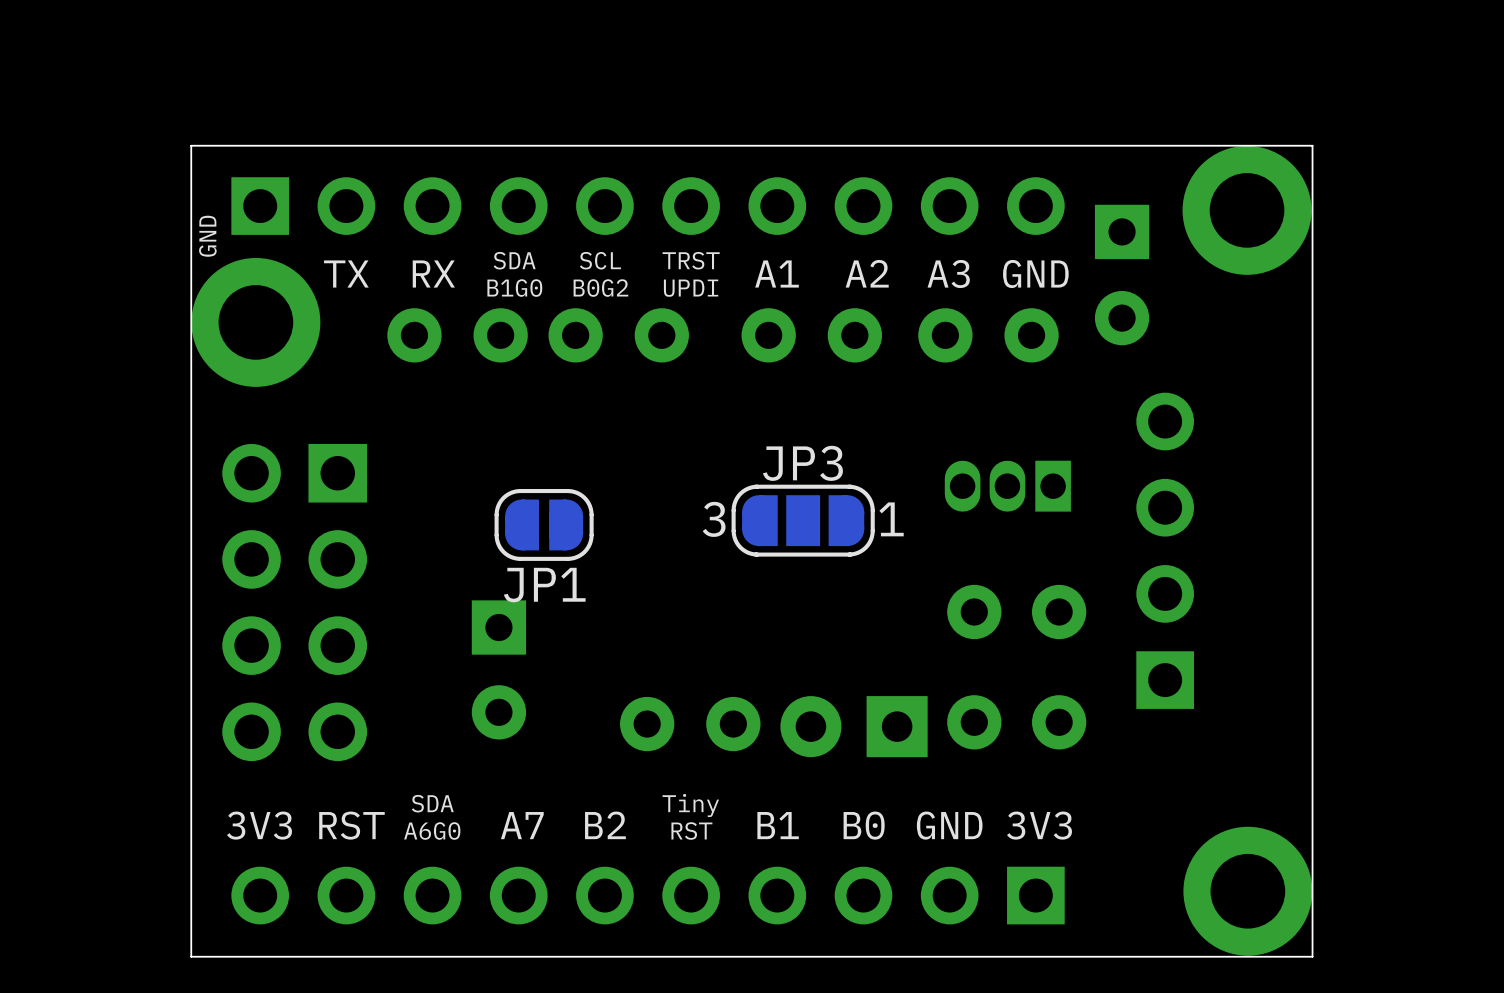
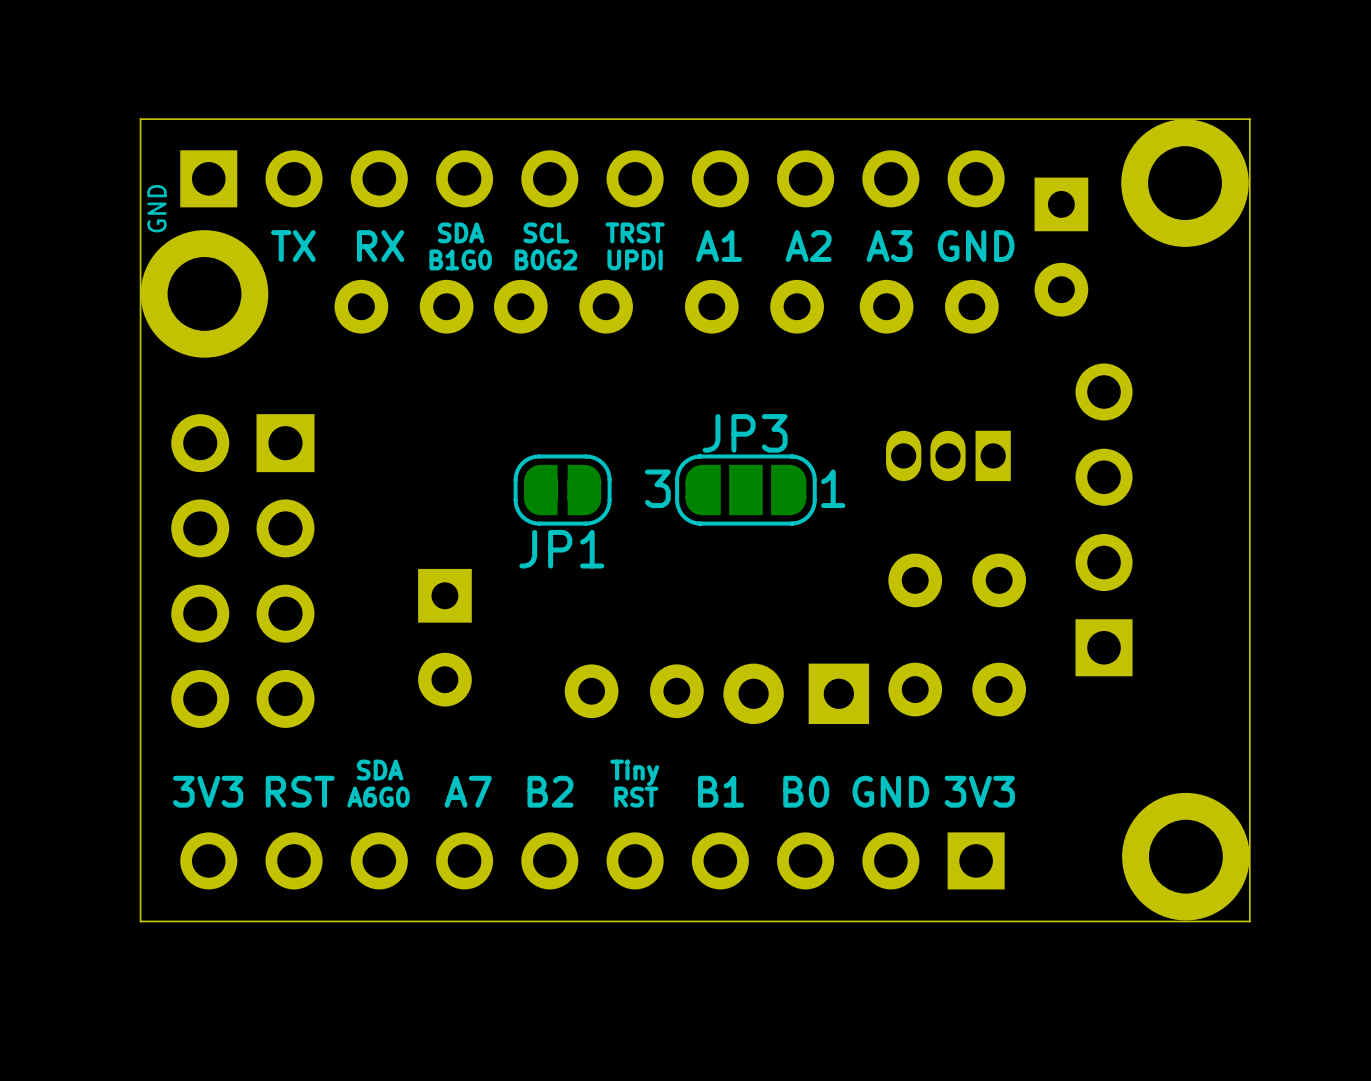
JP1 position: (544, 524) -> (562, 490)

